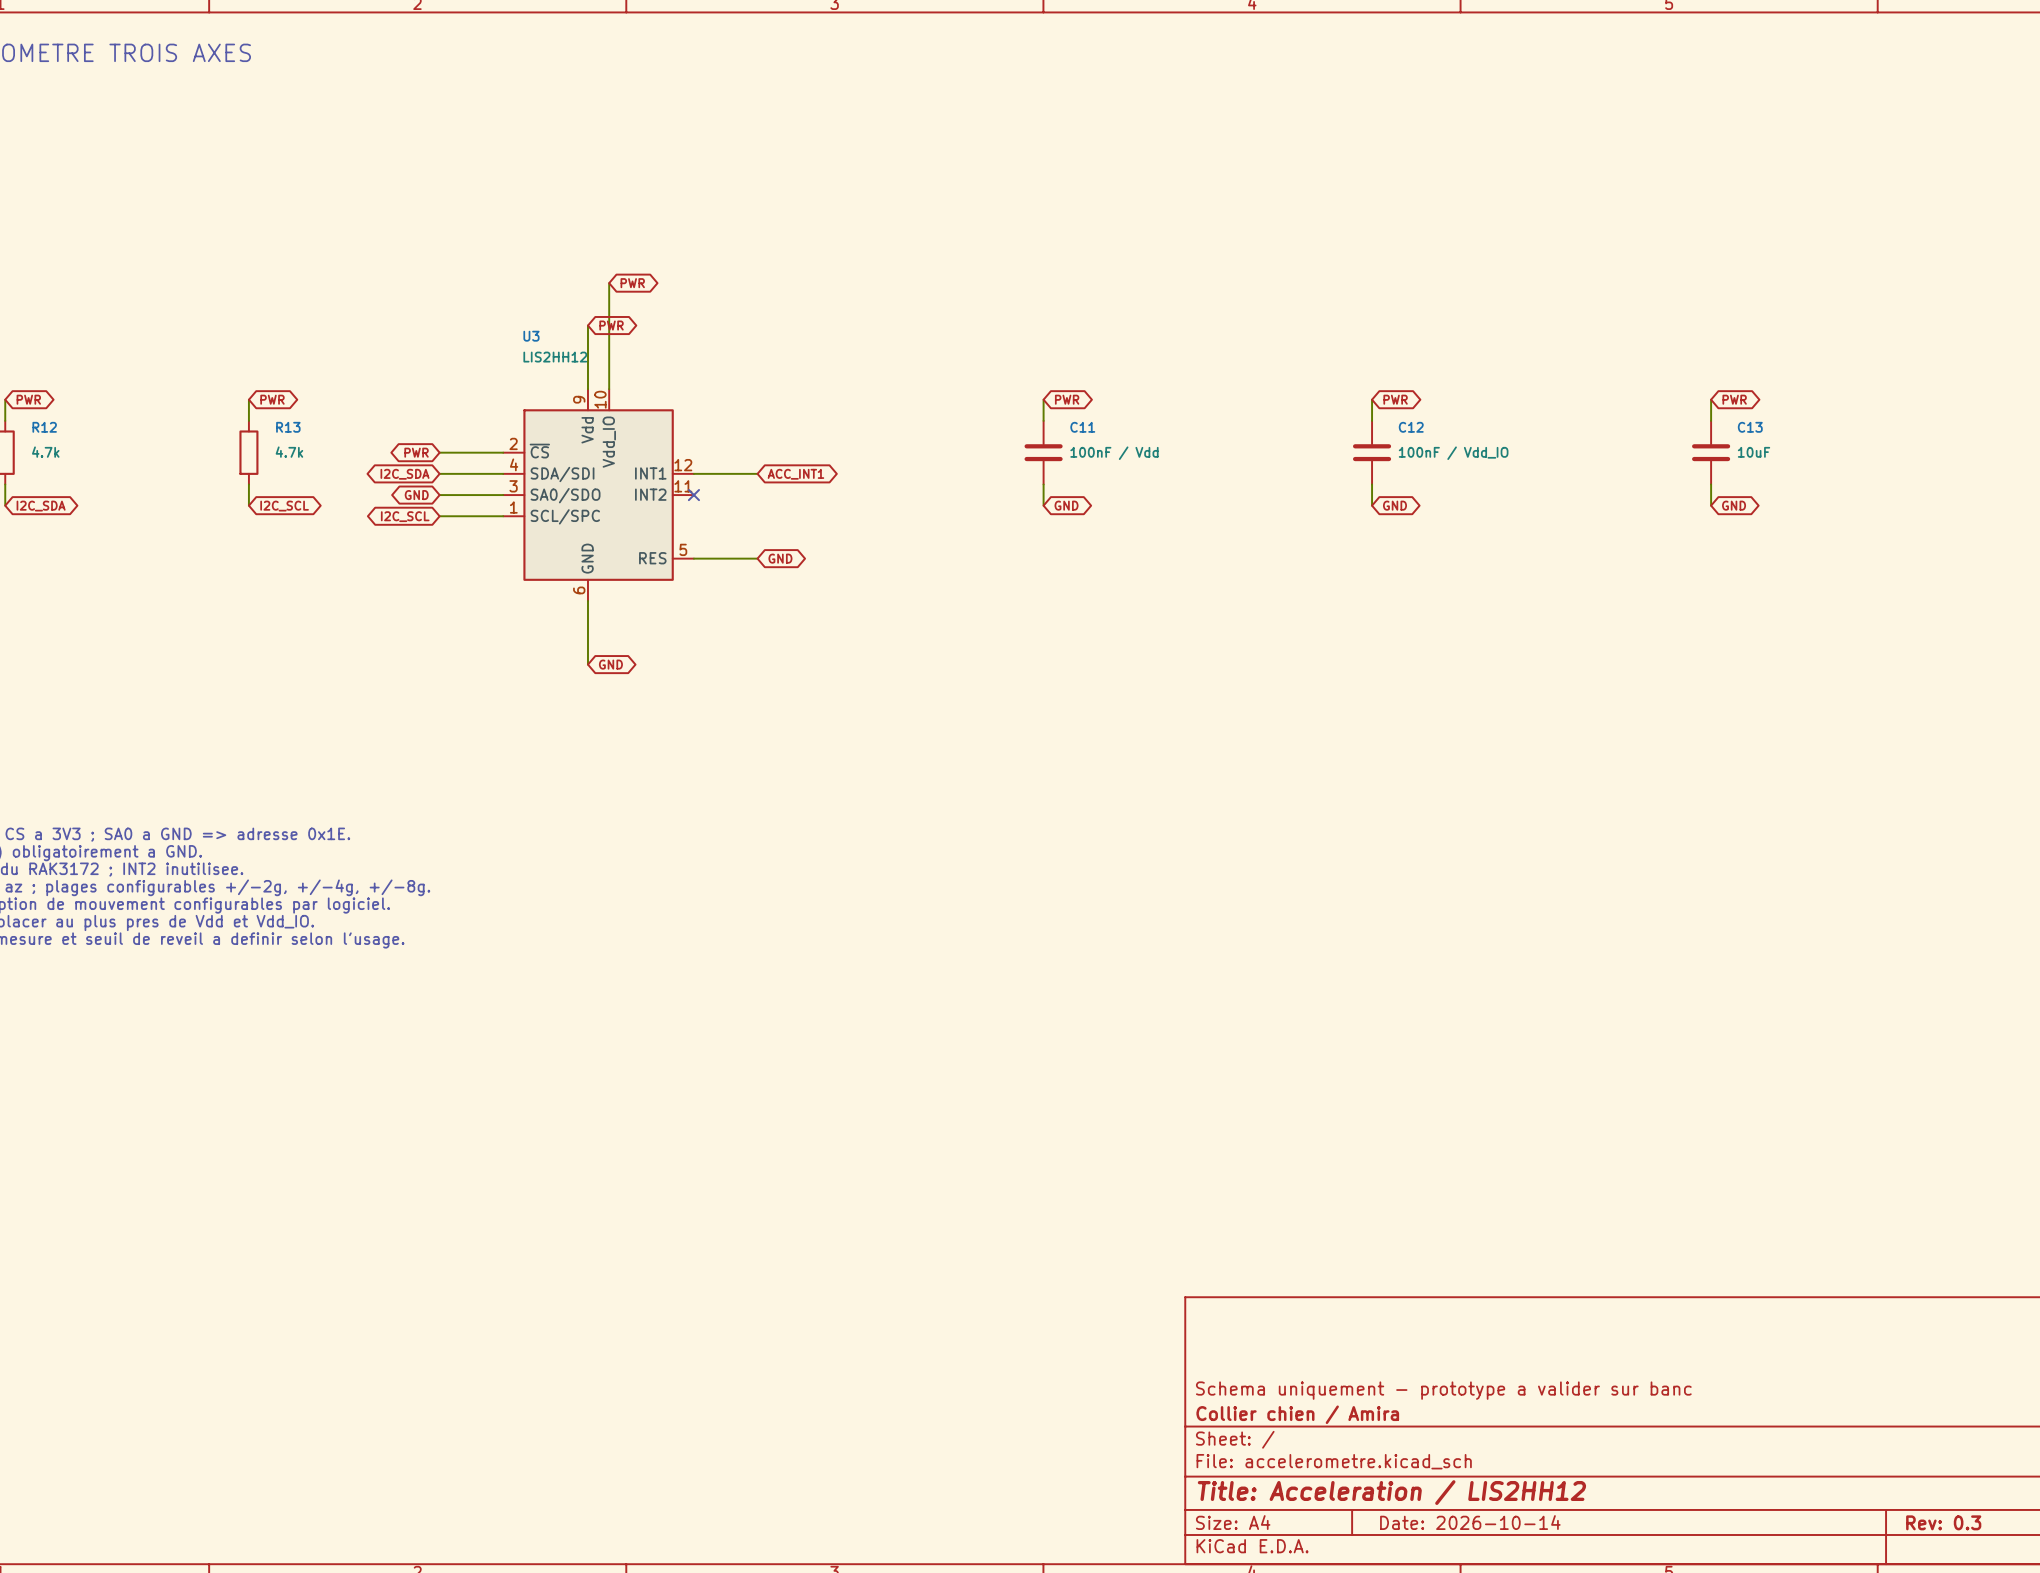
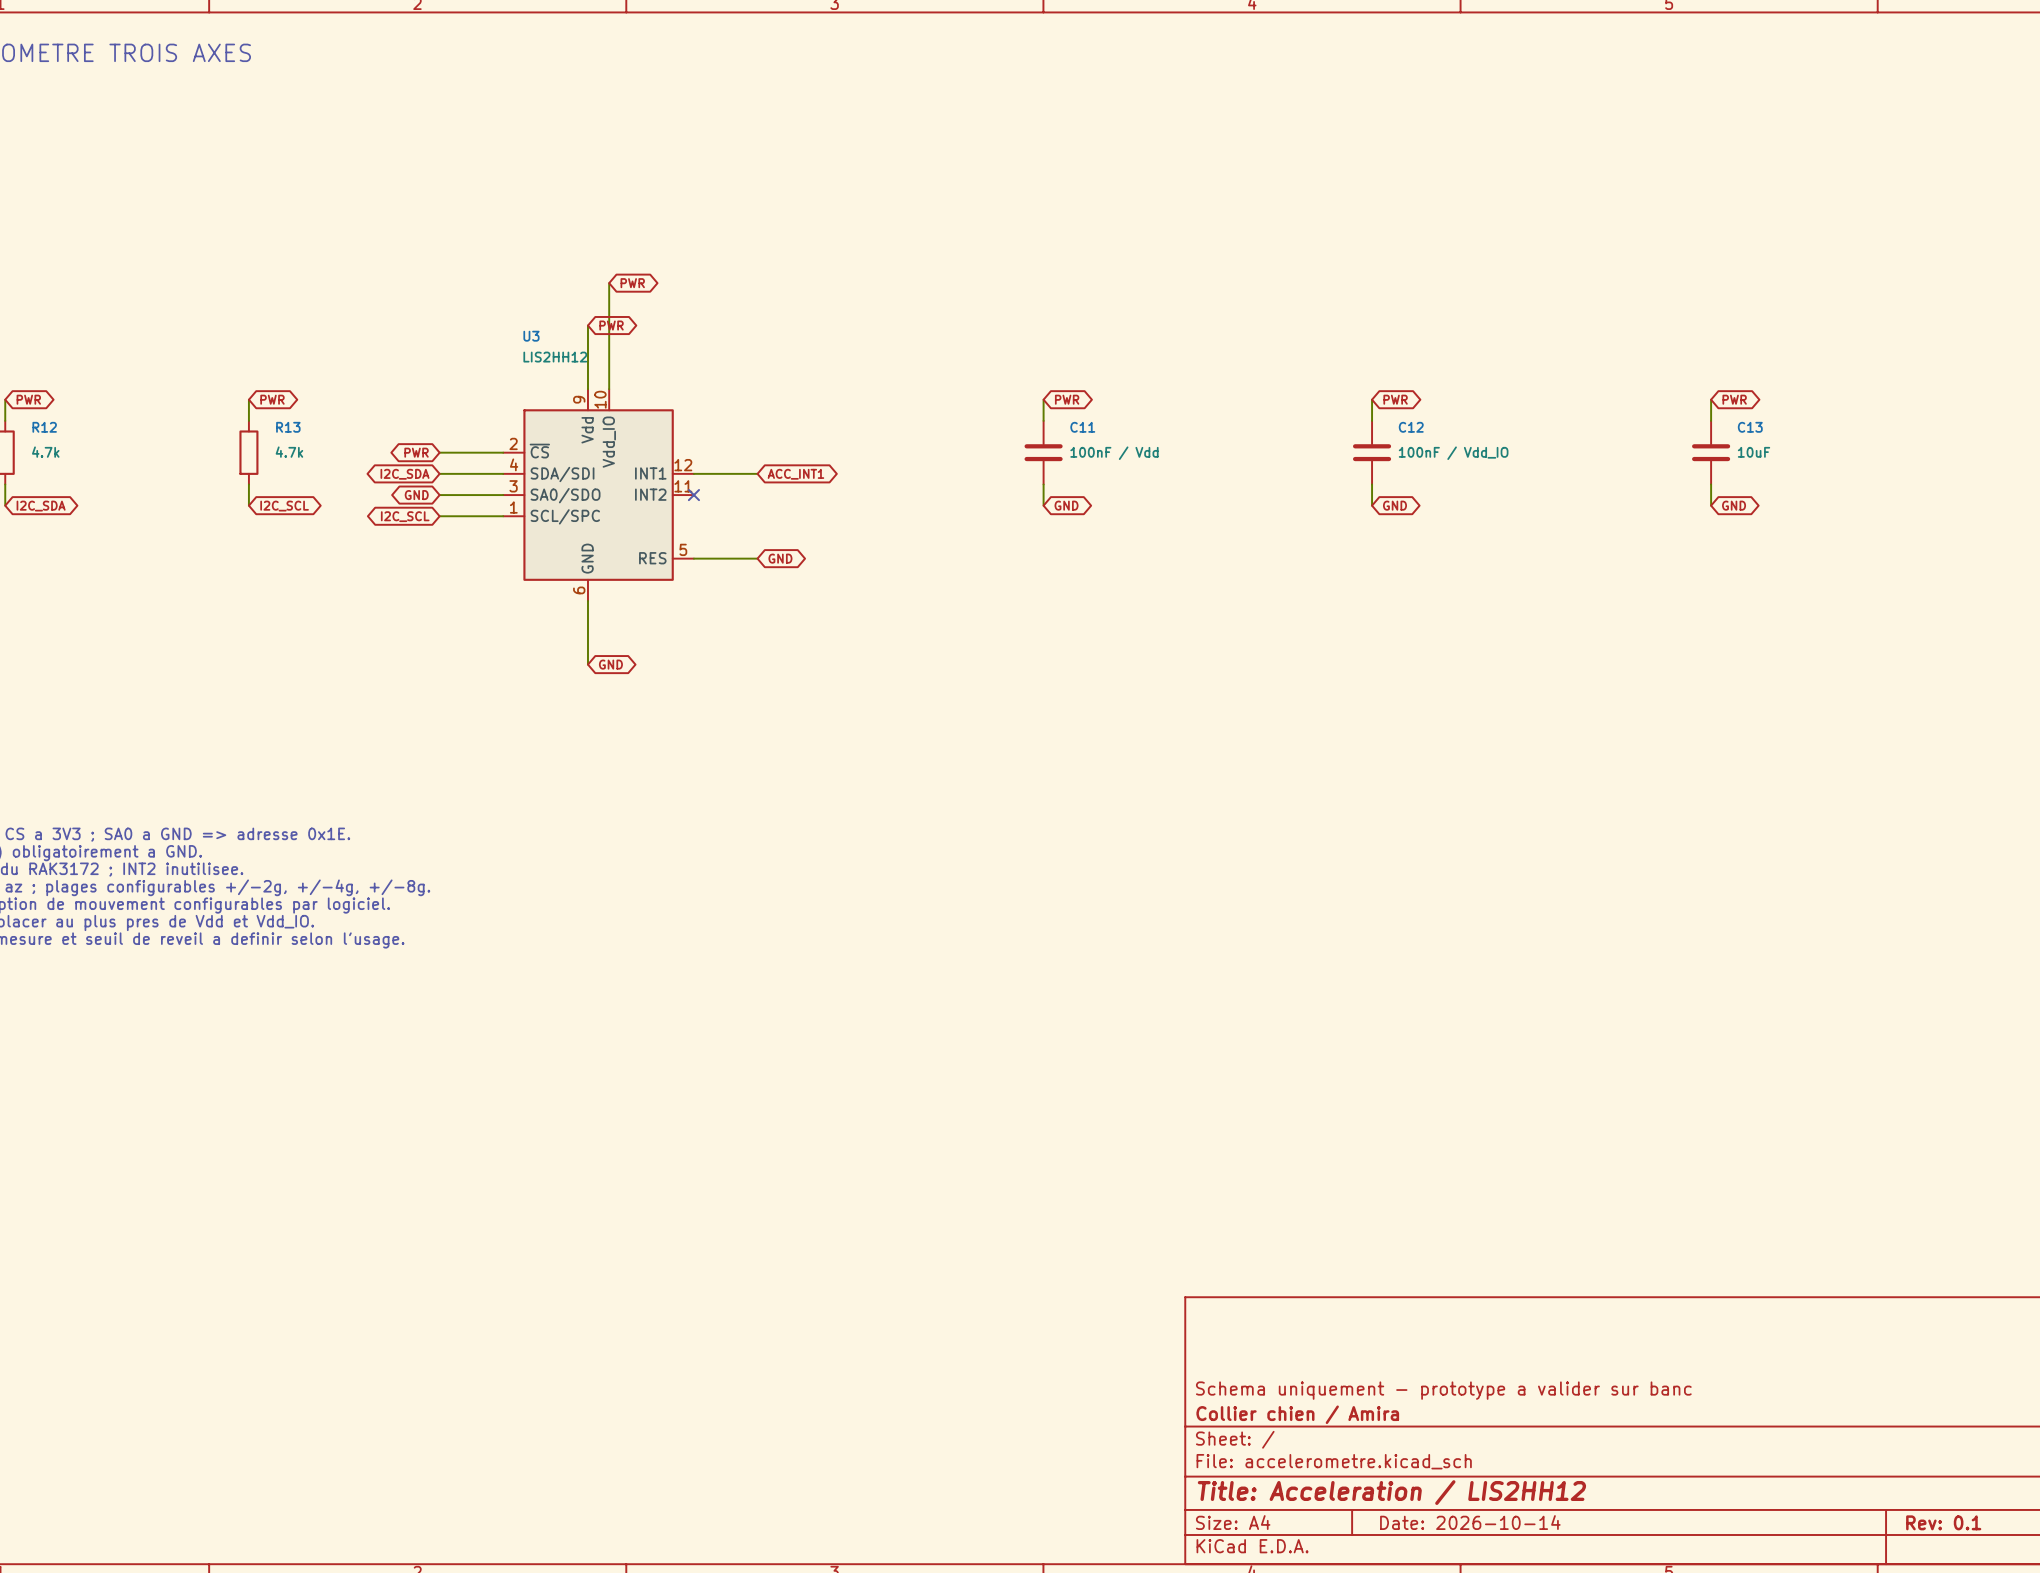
title block: Rev: 0.3 (1943, 1522) -> Rev: 0.1 (1943, 1522)

